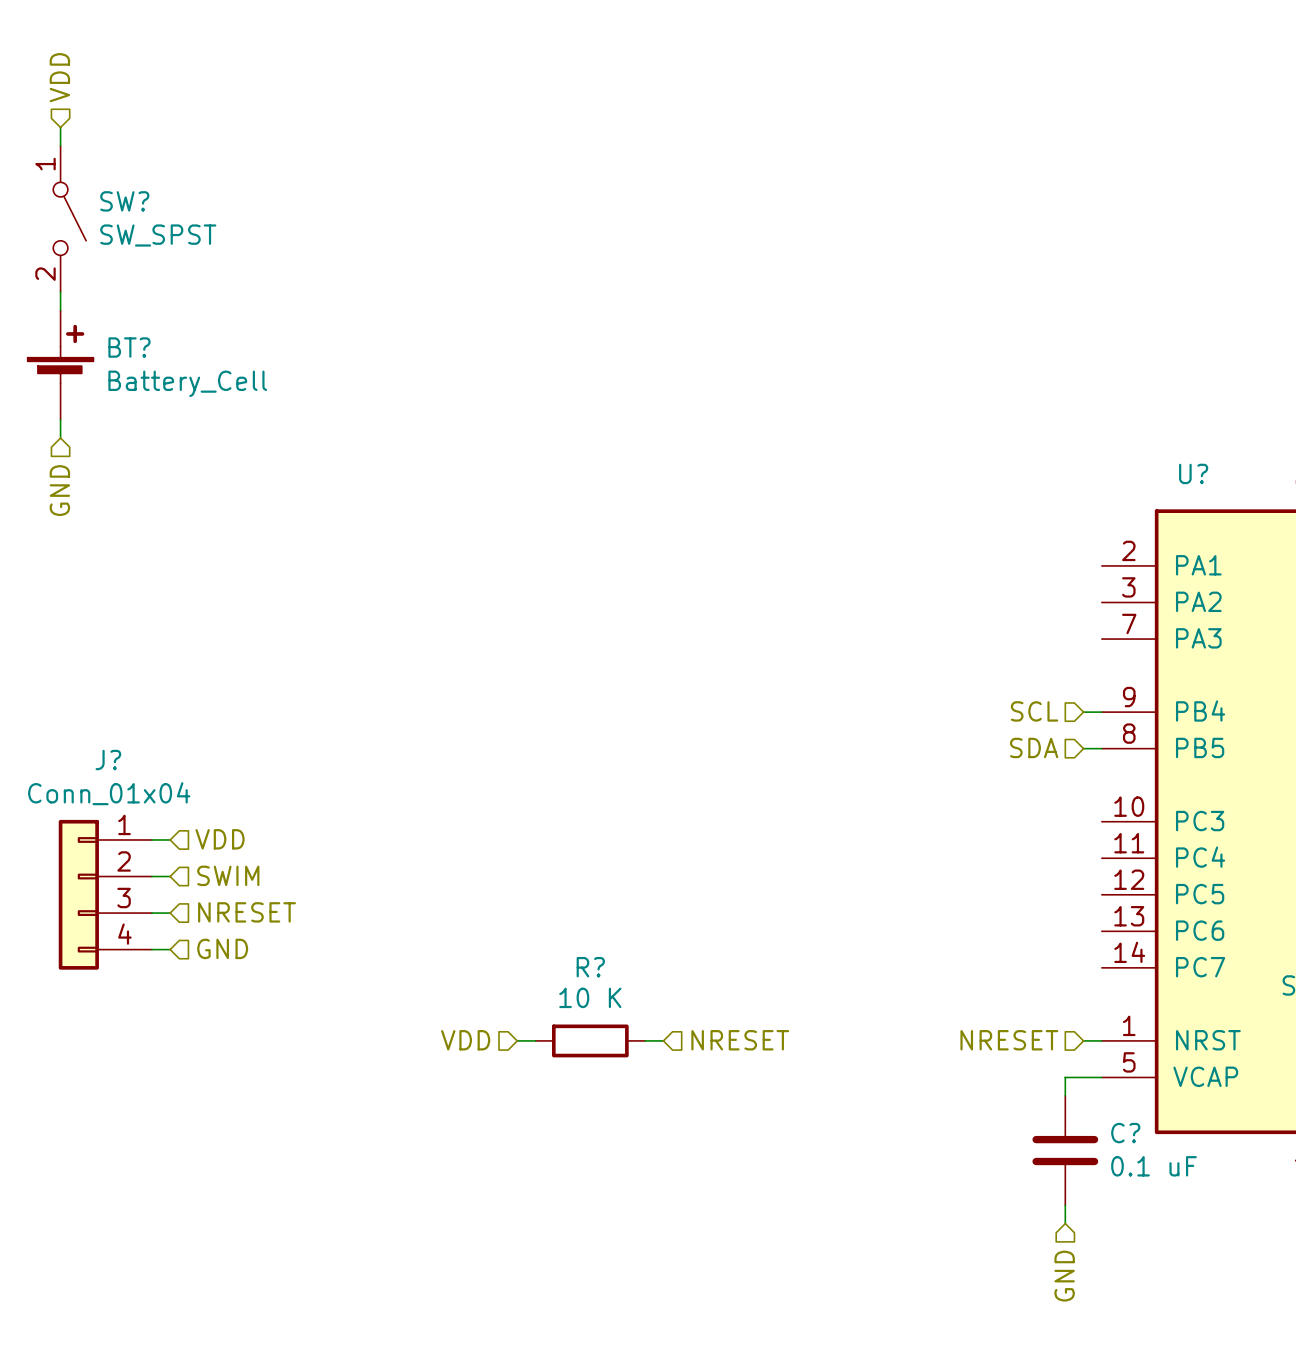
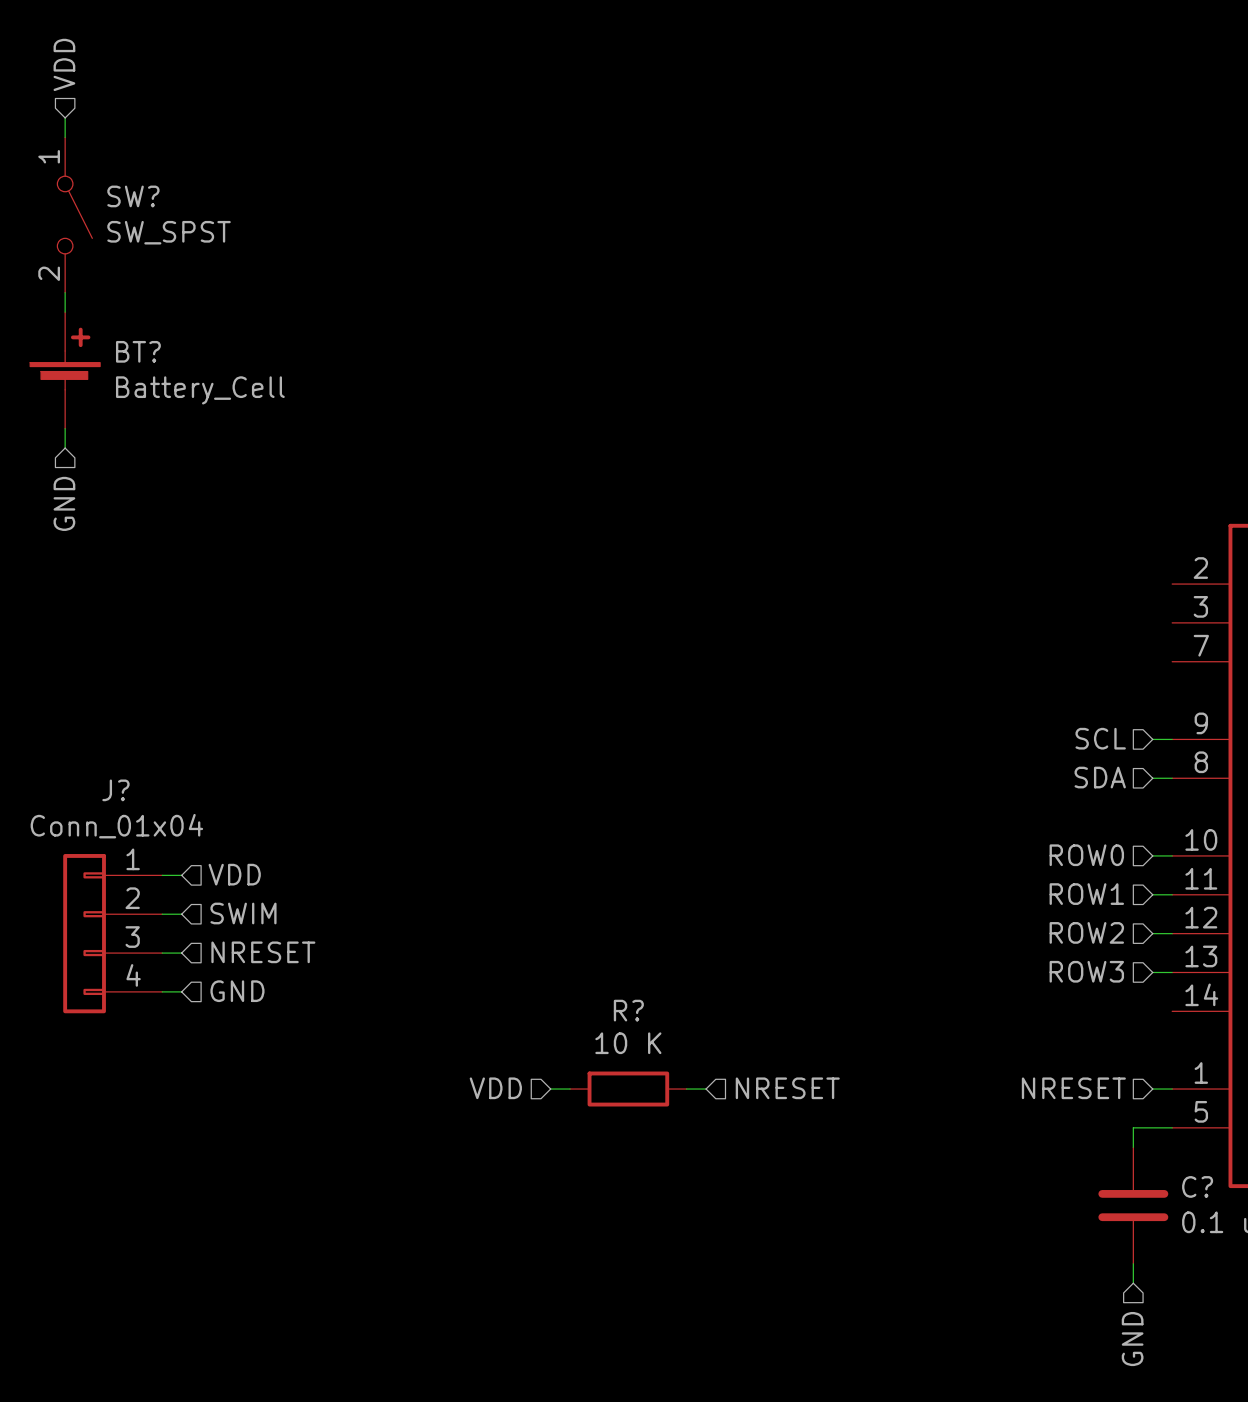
hierarchical label: none -> ROW0 (1086, 855)
wire: none -> (1152, 855) (1172, 855)
hierarchical label: none -> ROW1 (1086, 894)
wire: none -> (1152, 894) (1172, 894)
hierarchical label: none -> ROW2 (1086, 932)
wire: none -> (1152, 933) (1172, 933)
hierarchical label: none -> ROW3 (1086, 971)
wire: none -> (1152, 972) (1172, 972)

